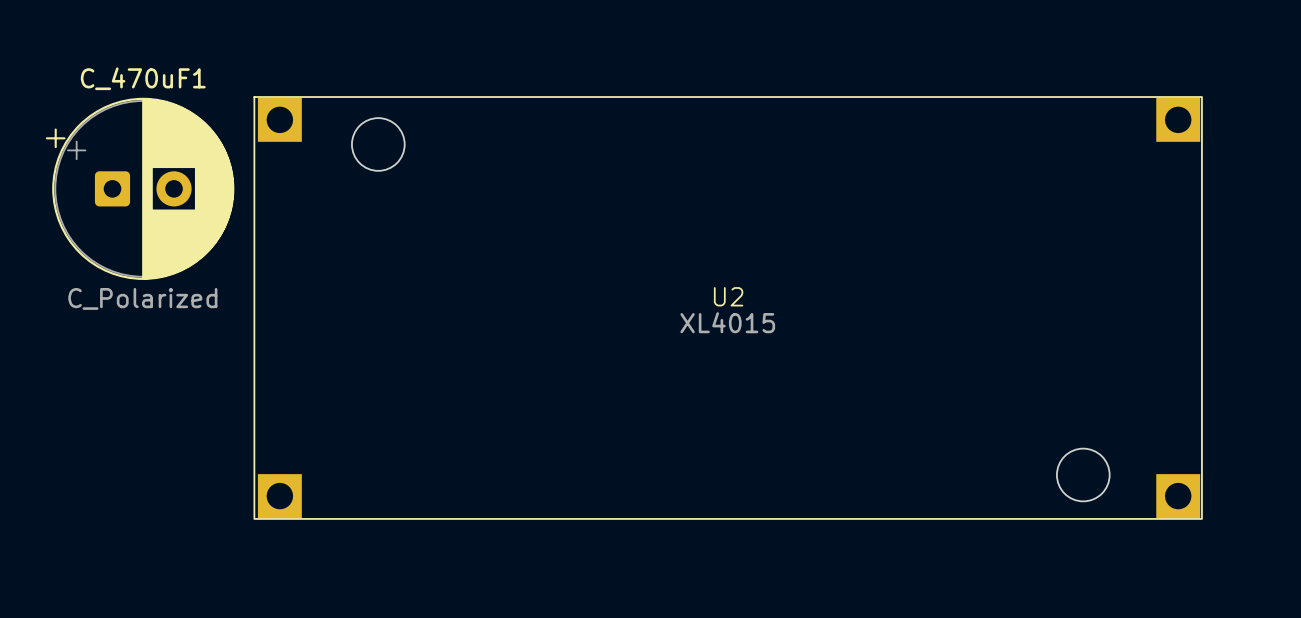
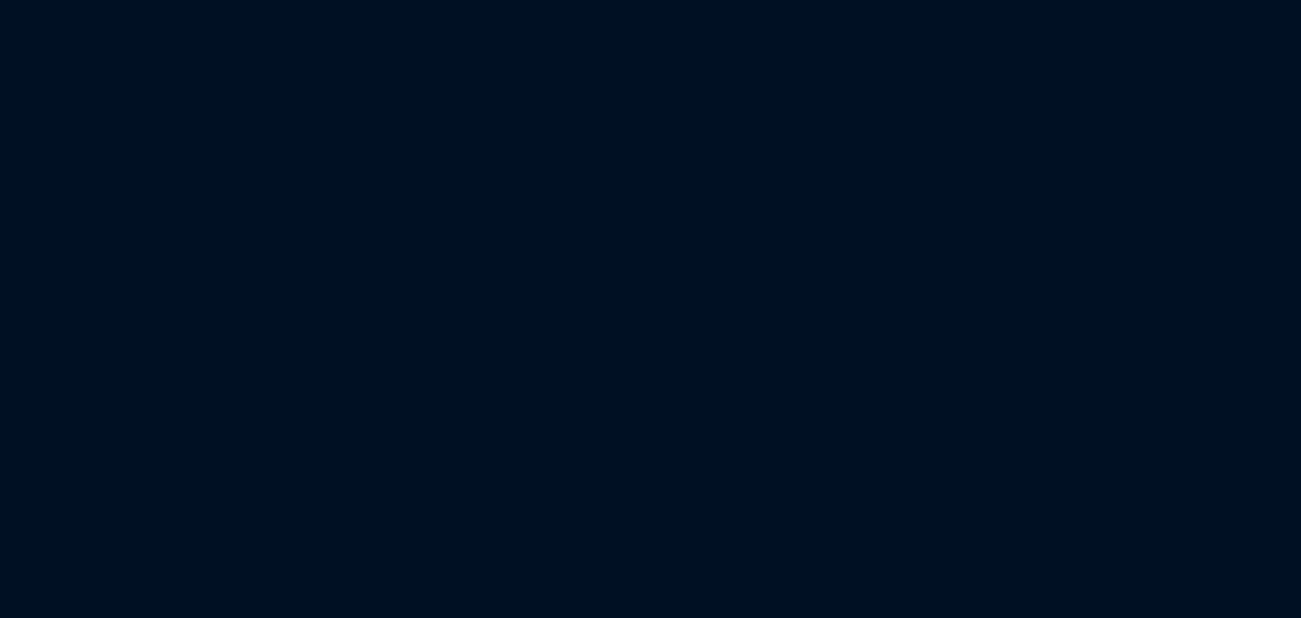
C_470uF1: C_Polarized (140, 188) -> none
U2: XL4015 (728, 307) -> none

